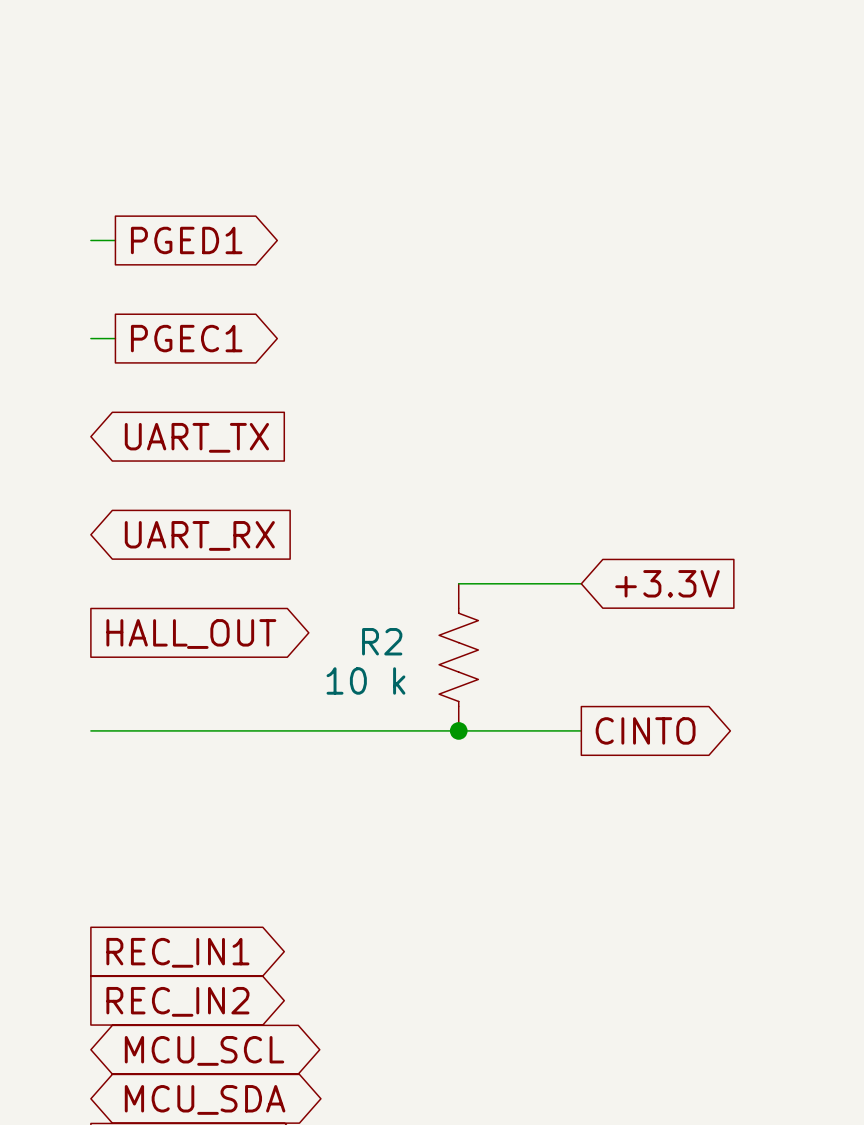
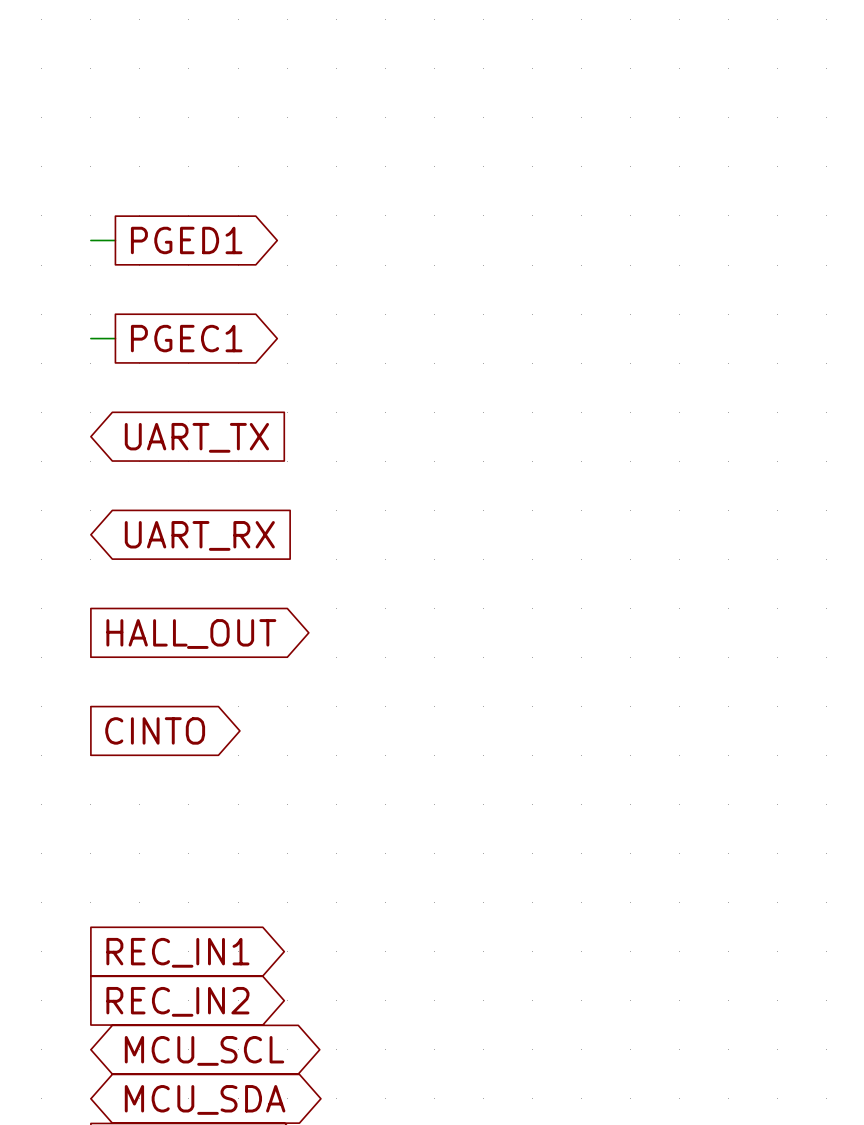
wire: (458, 583) (581, 583) -> none
global label: +3.3V (667, 583) -> none
R2: 10 k (458, 657) -> none
wire: (90, 730) (581, 730) -> none
global label: none -> CINTO (155, 730)
junction: (458, 730) -> none
global label: CINTO (645, 730) -> none

